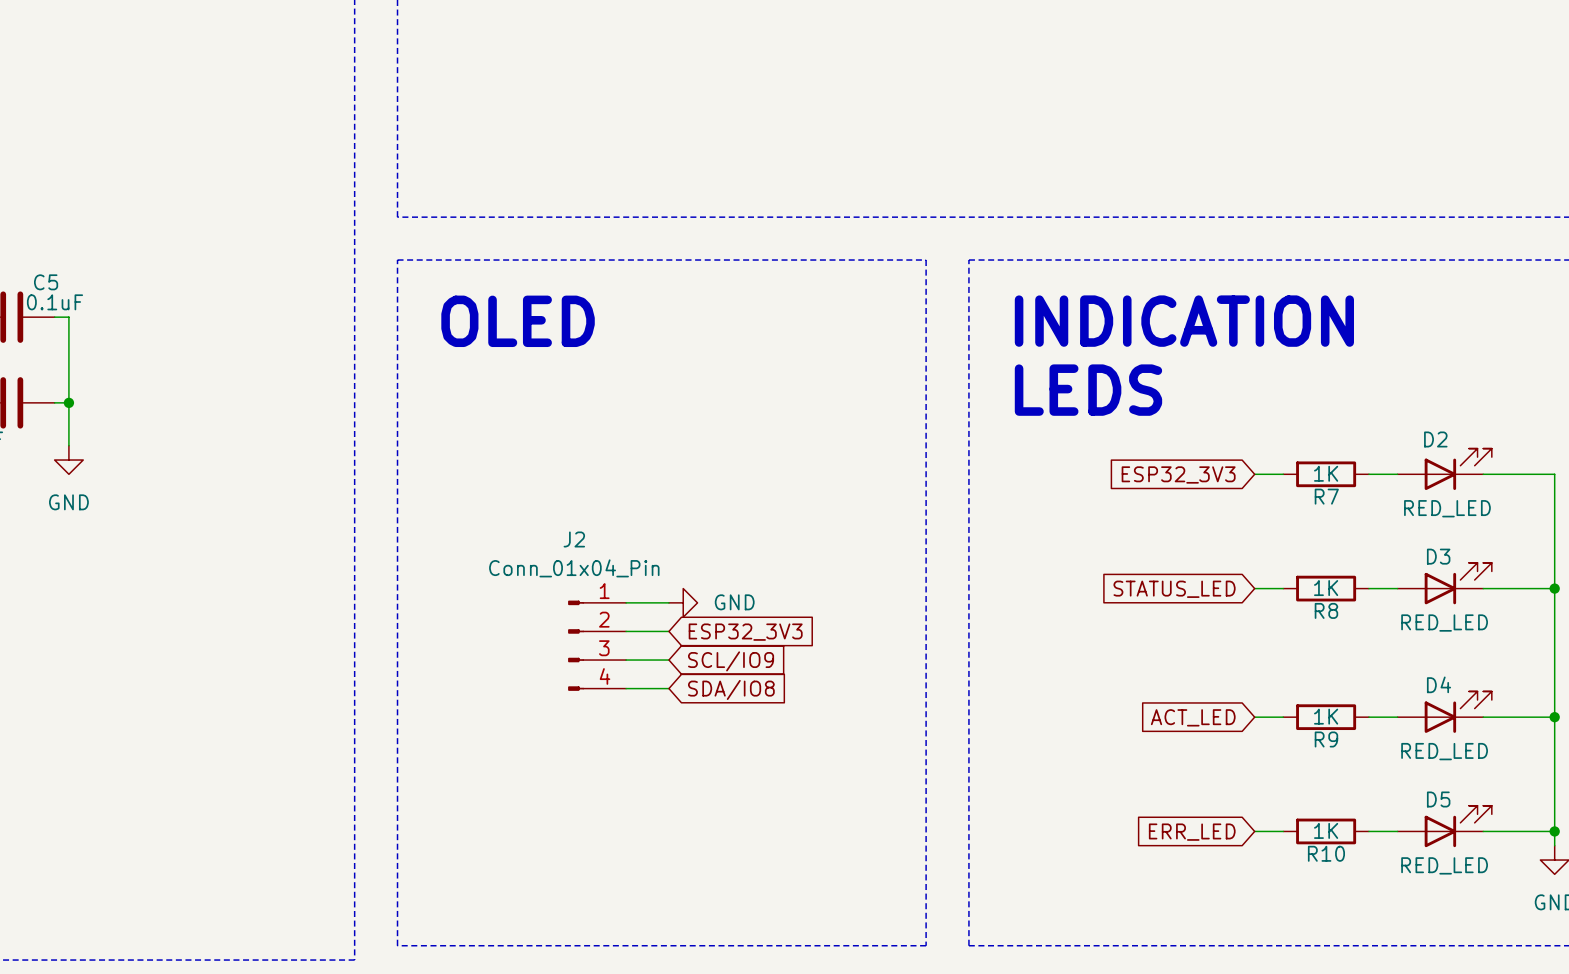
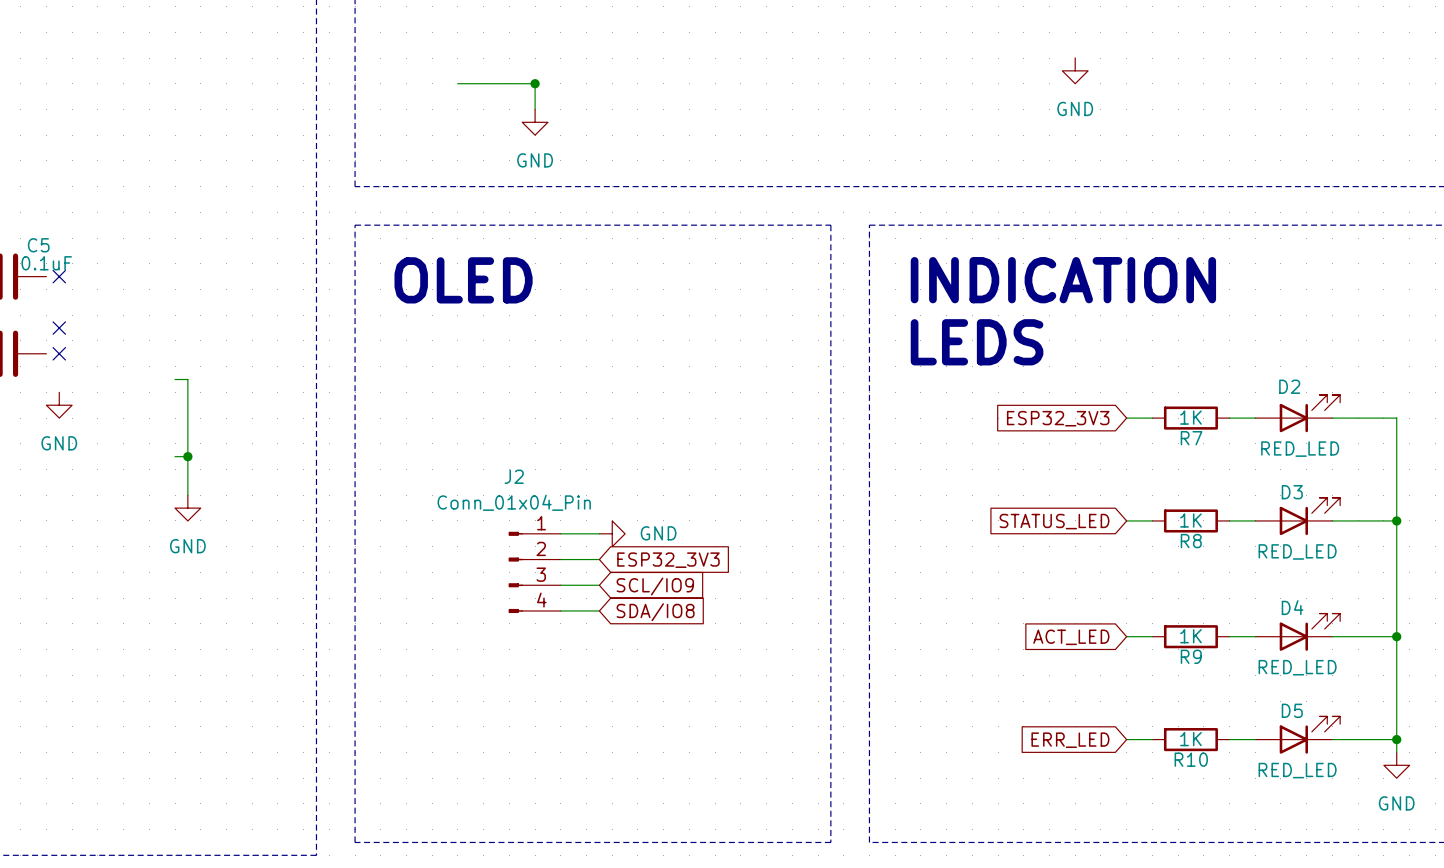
power symbol: none -> GND (1075, 70)
wire: none -> (457, 83) (535, 83) (535, 109)
junction: none -> (535, 83)
power symbol: none -> GND (535, 122)
wire: (54, 317) (68, 317) (68, 445) -> (175, 379) (187, 379) (187, 495)
no-connect mark: none -> (59, 276)
no-connect mark: none -> (59, 328)
wire: (54, 402) (68, 402) -> (175, 456) (187, 456)
junction: (68, 402) -> none
no-connect mark: none -> (59, 353)
junction: none -> (187, 456)
power symbol: none -> GND (187, 508)

